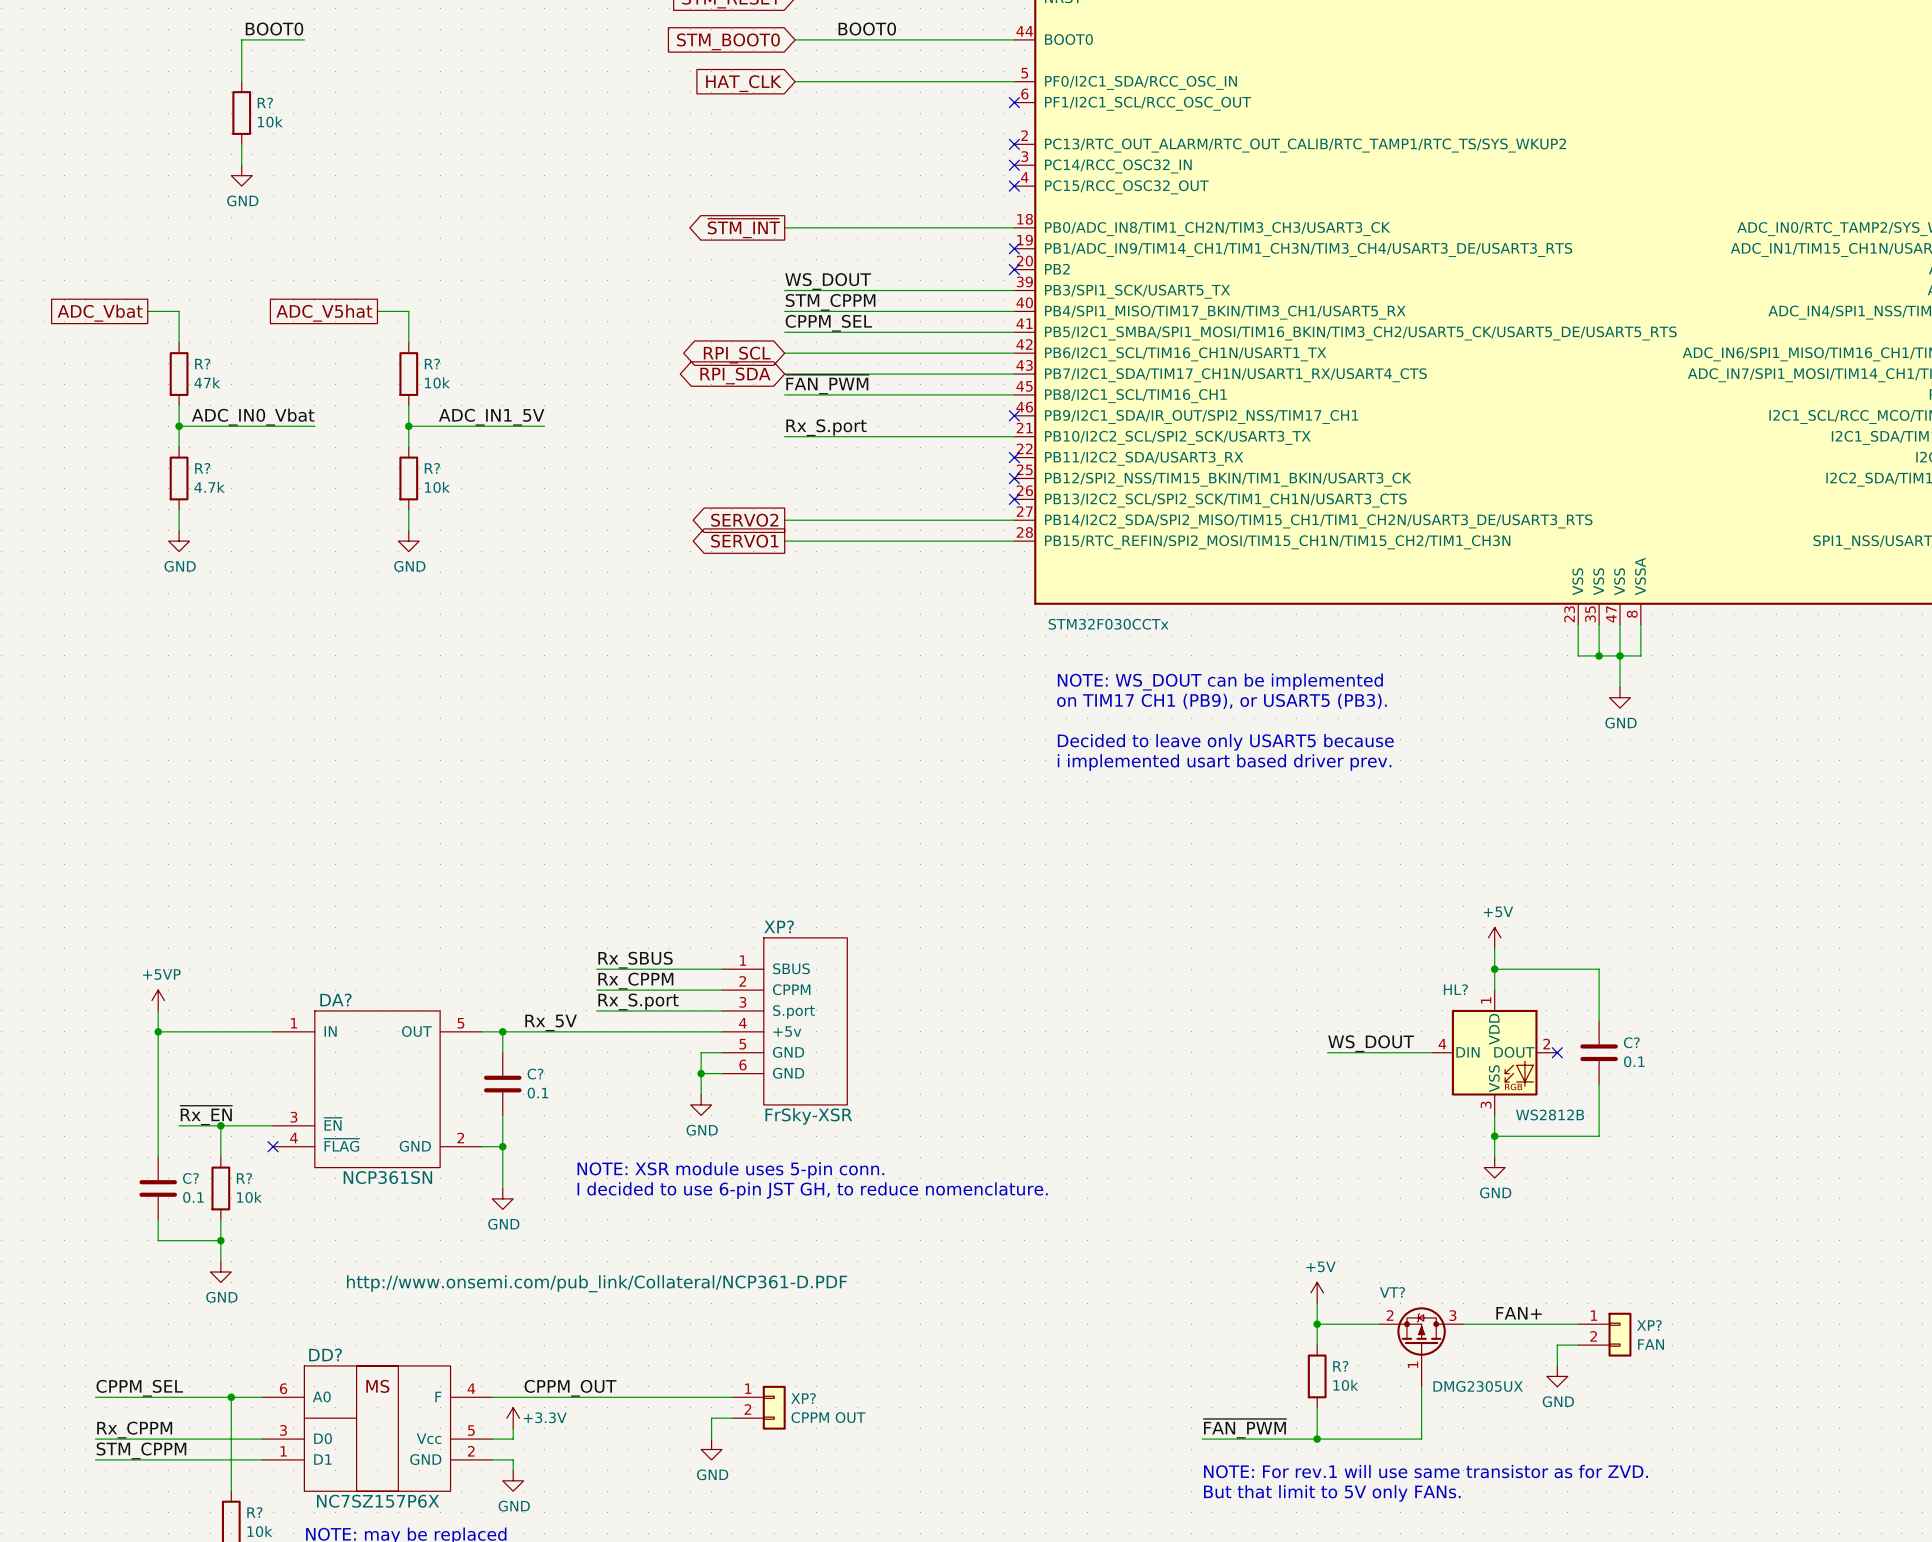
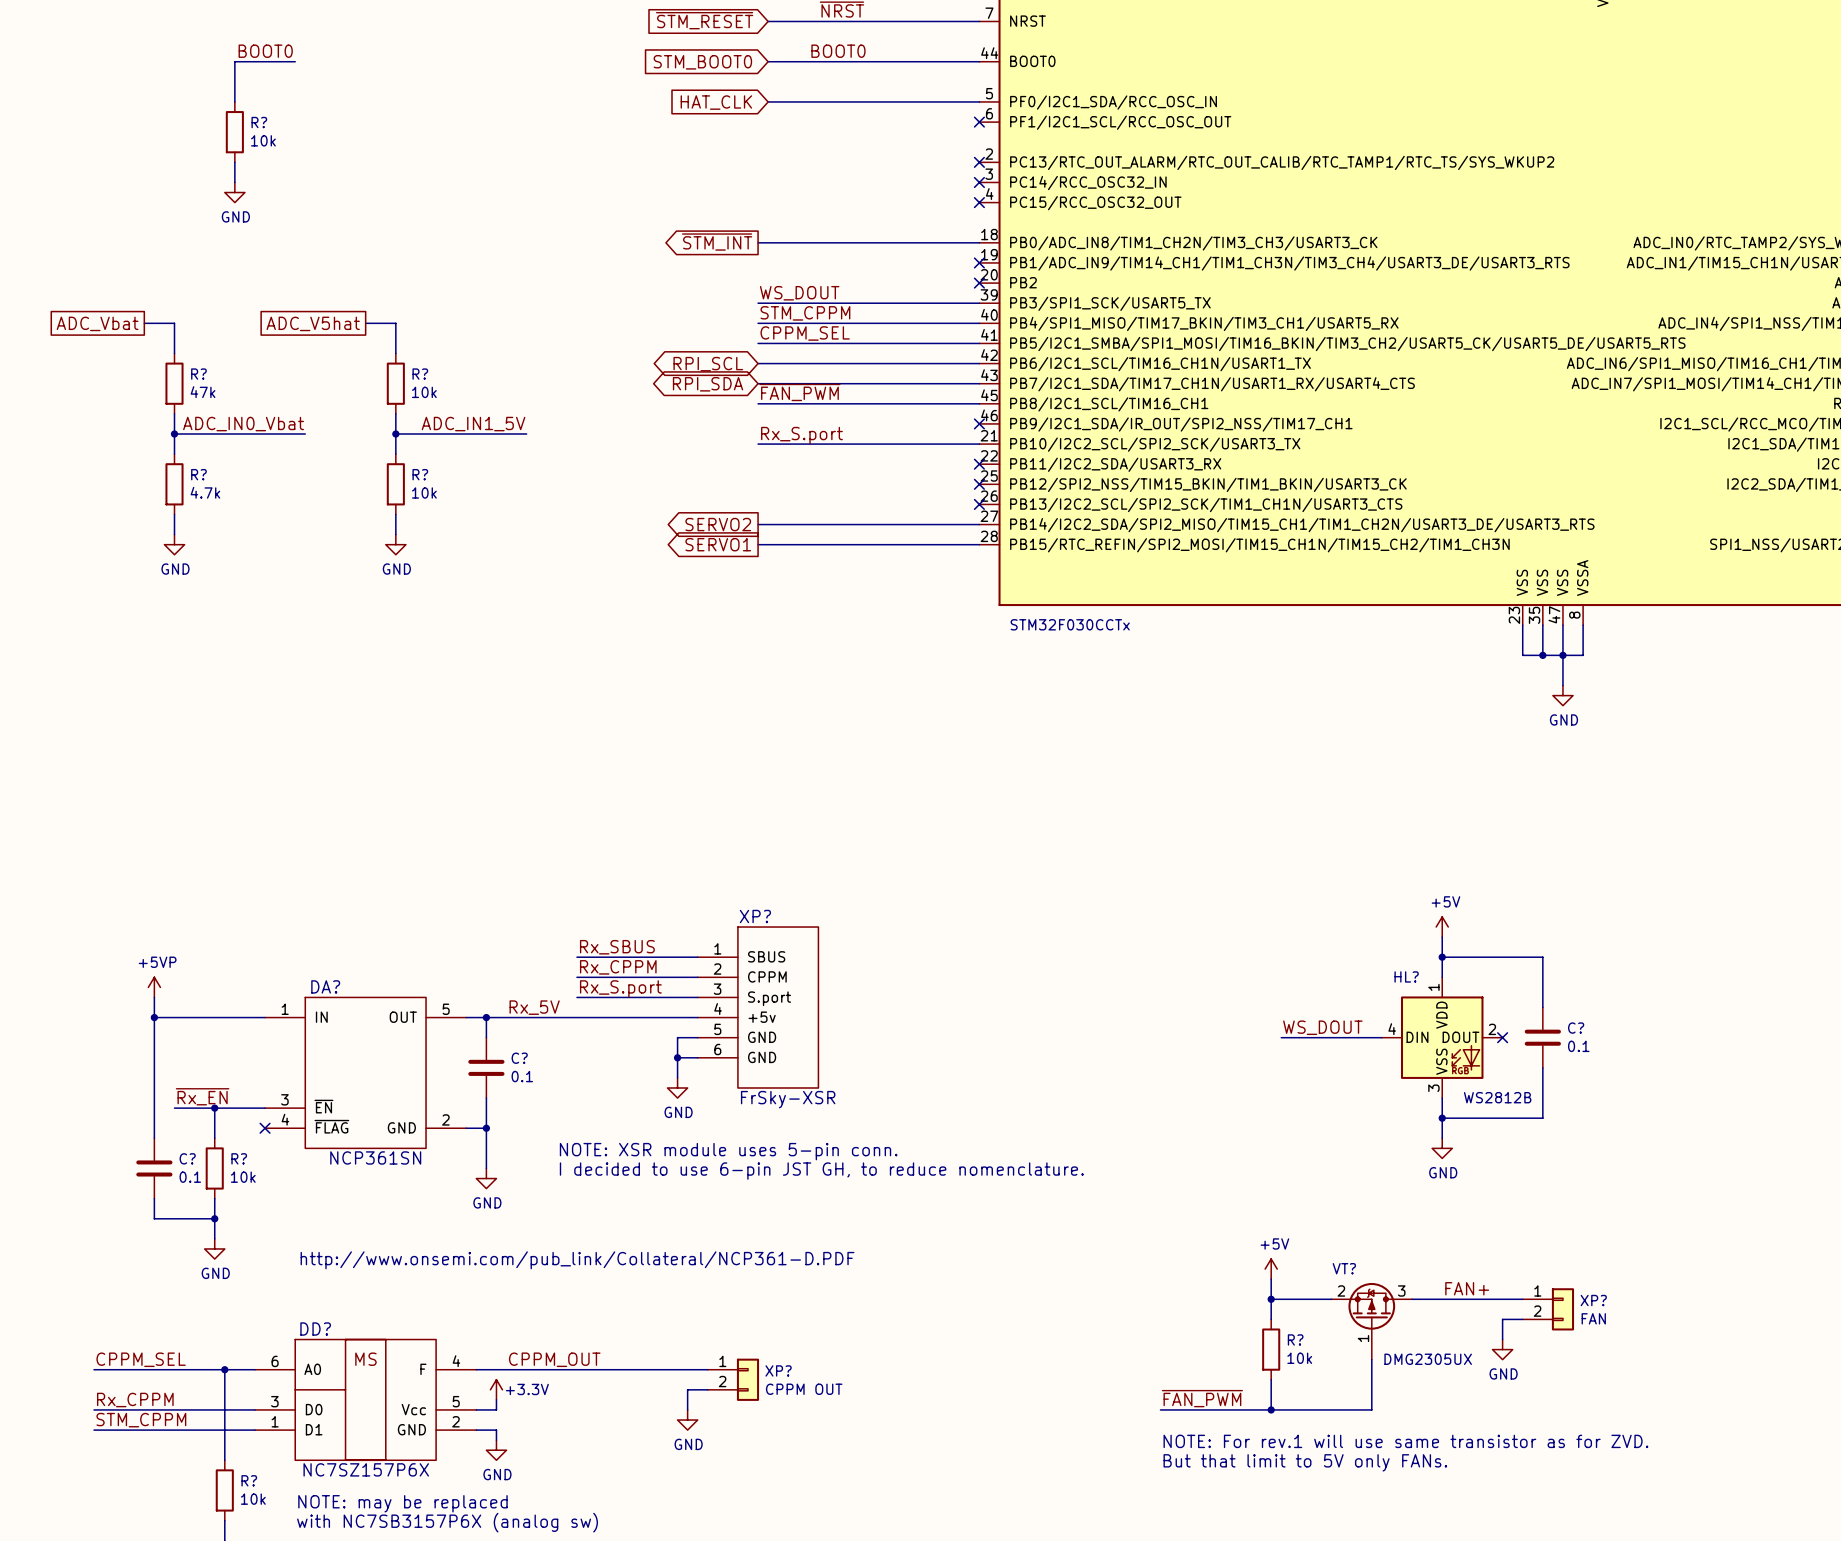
text: NOTE: WS_DOUT can be implemented (1220, 682) -> none
text: on TIM17 CH1 (PB9), or USART5 (PB3). (1221, 701) -> none
text: Decided to leave only USART5 because (1225, 742) -> none
text: i implemented usart based driver prev. (1224, 762) -> none

